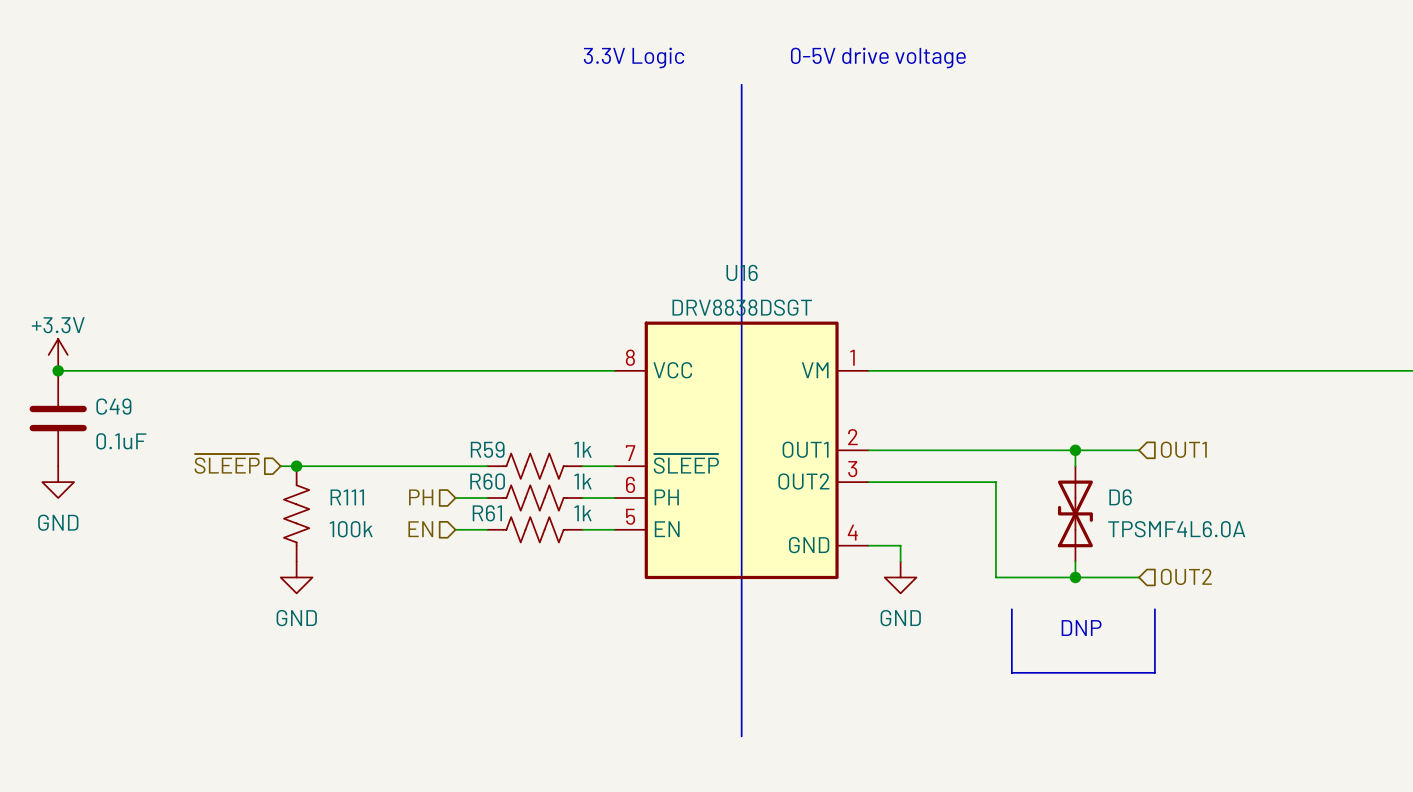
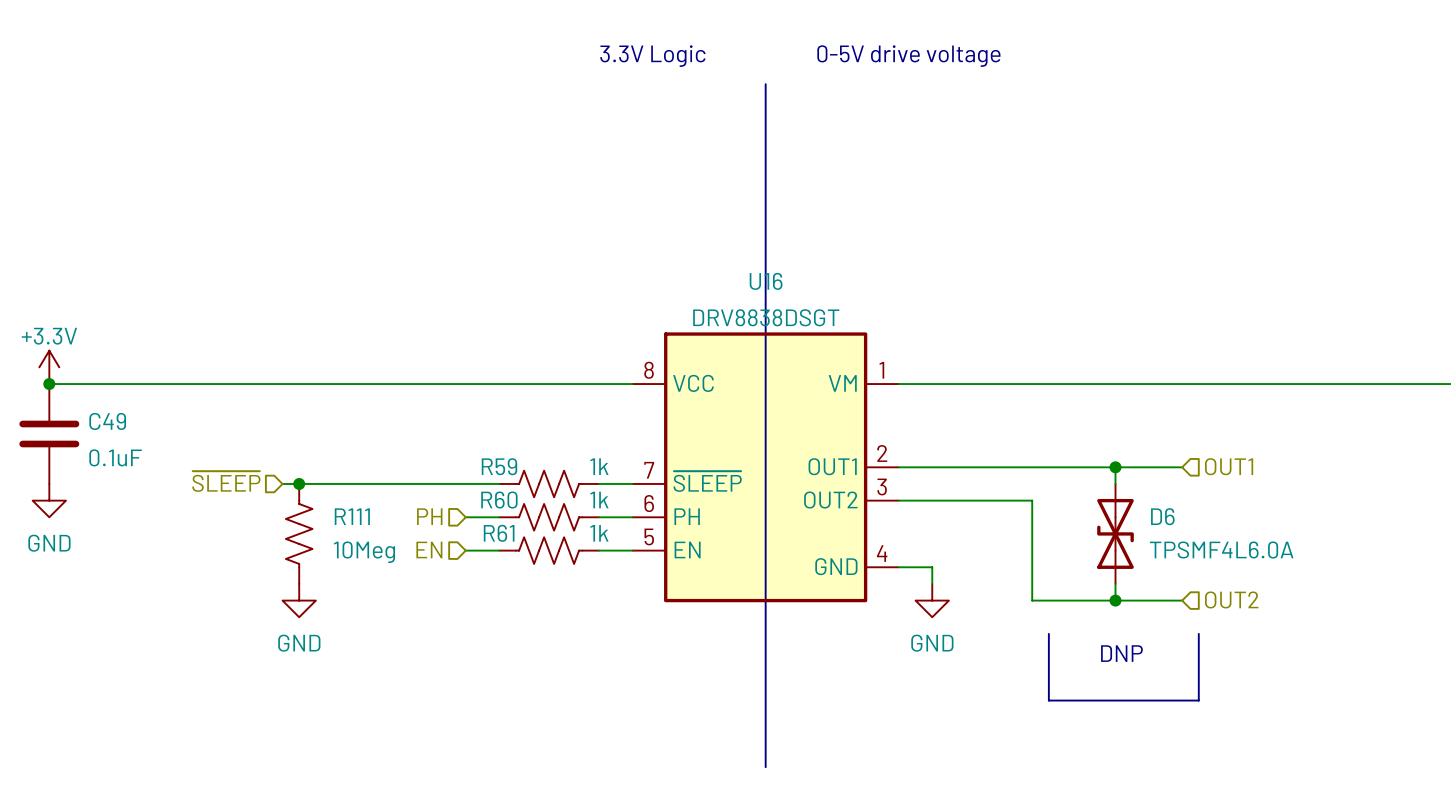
R111 value: 100k (351, 529) -> 10Meg (364, 552)

